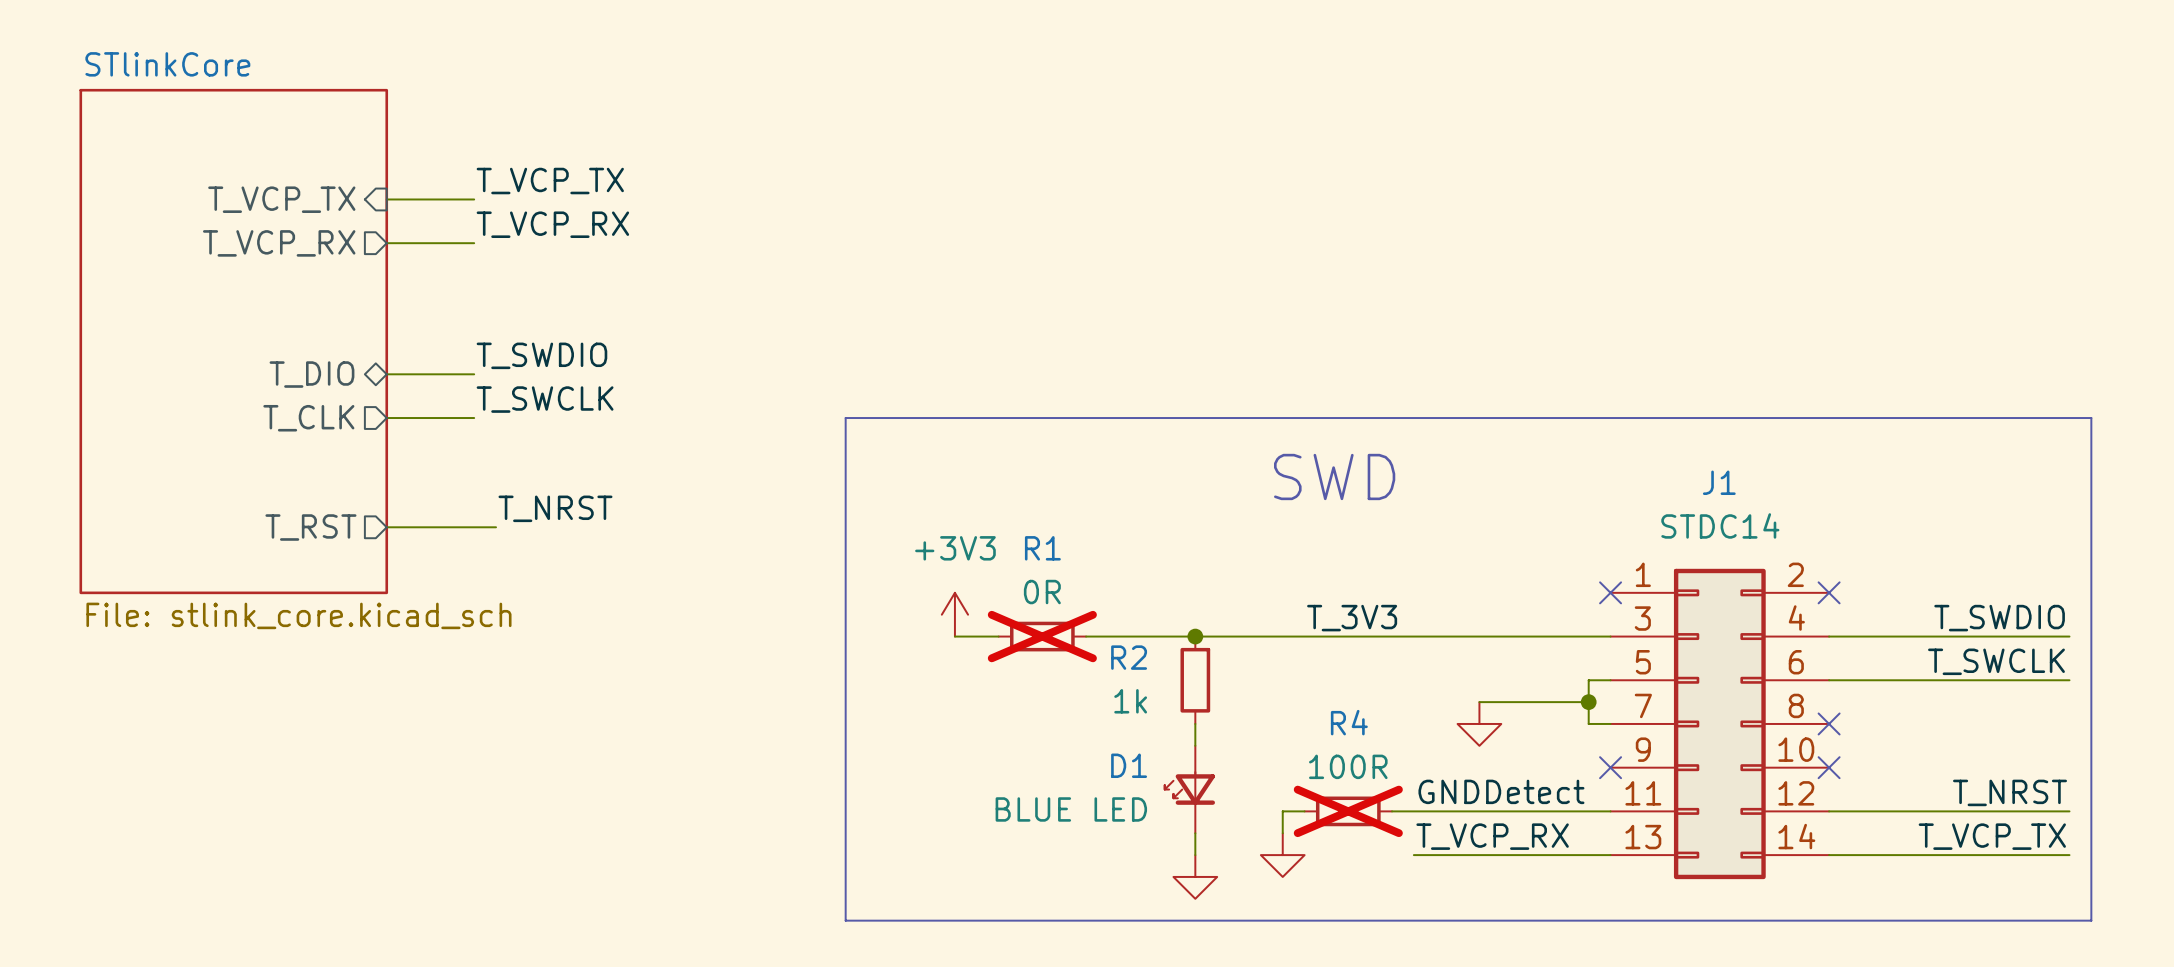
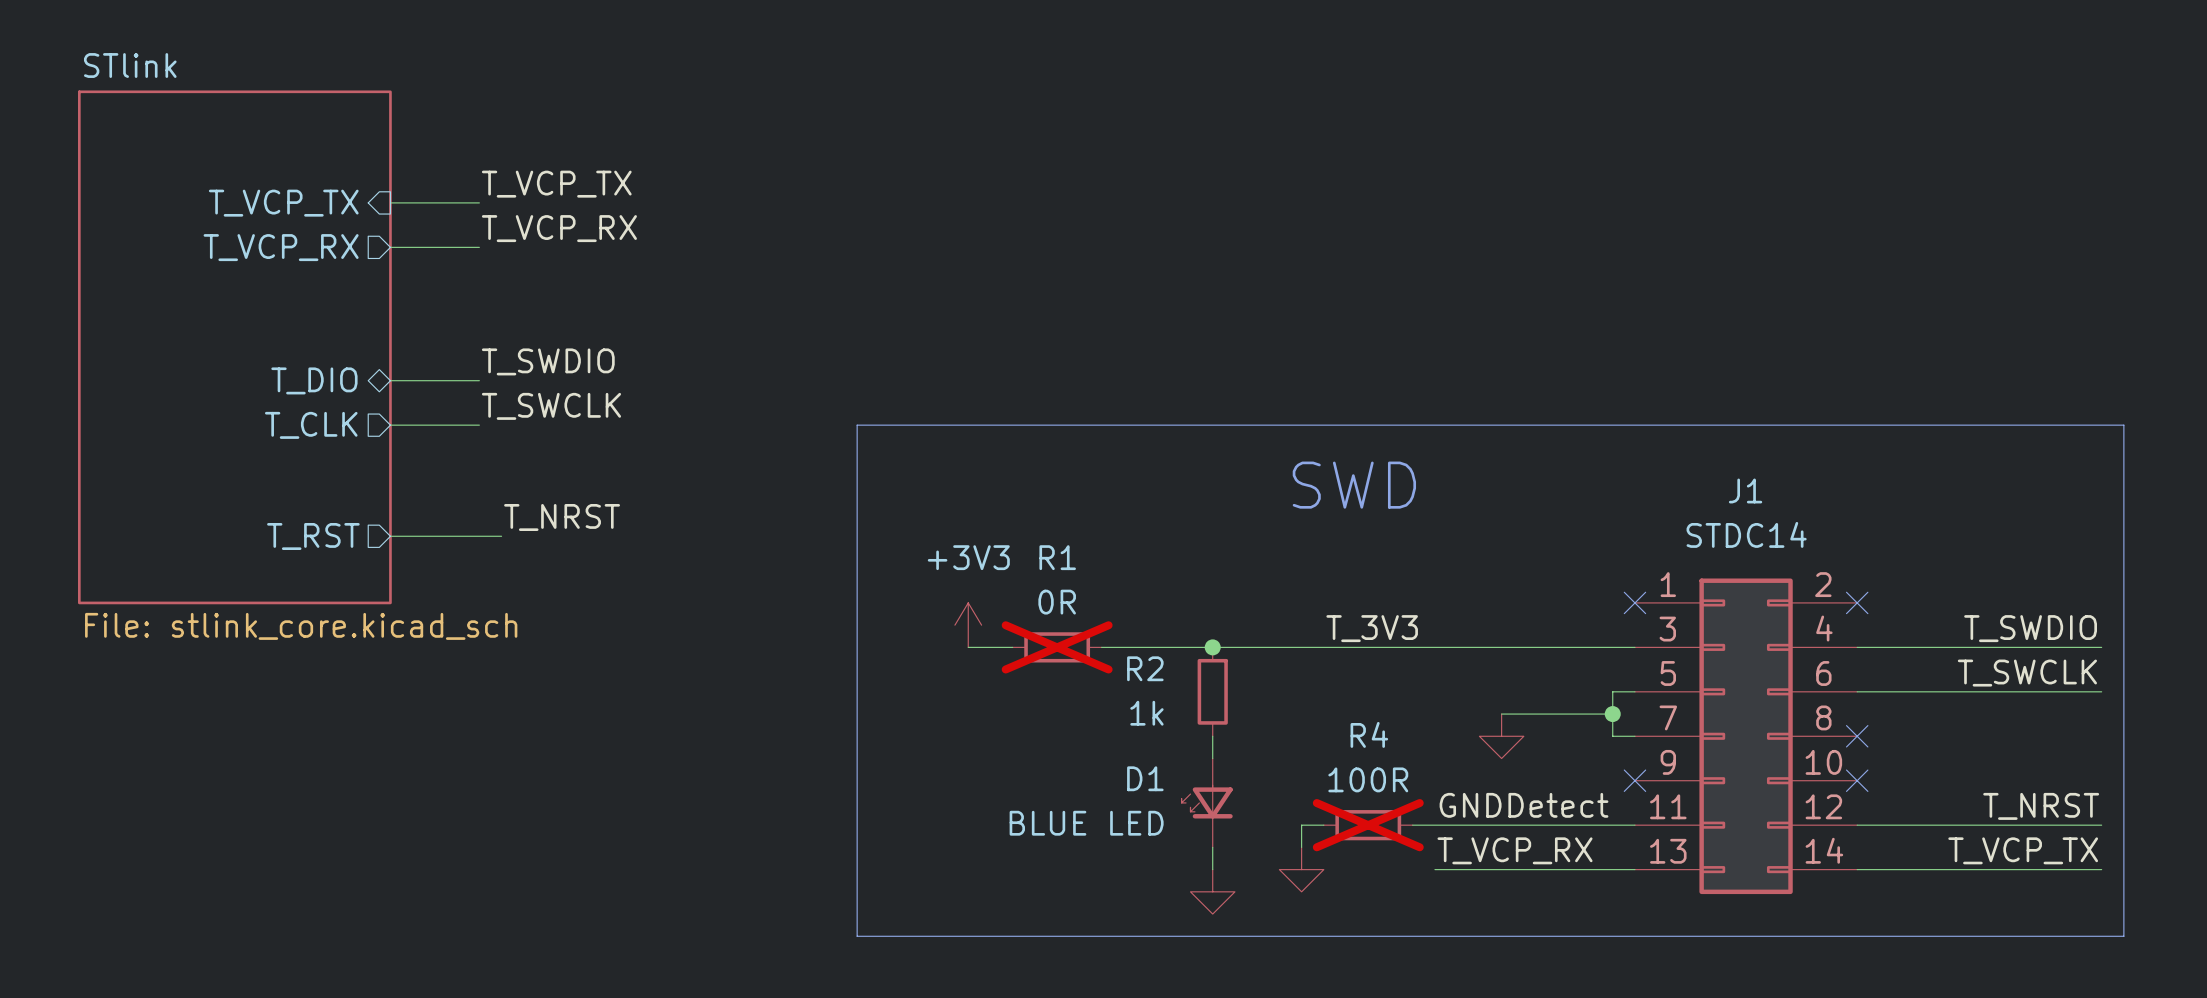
sheet STlinkCore name: STlinkCore (167, 64) -> STlink (130, 65)

